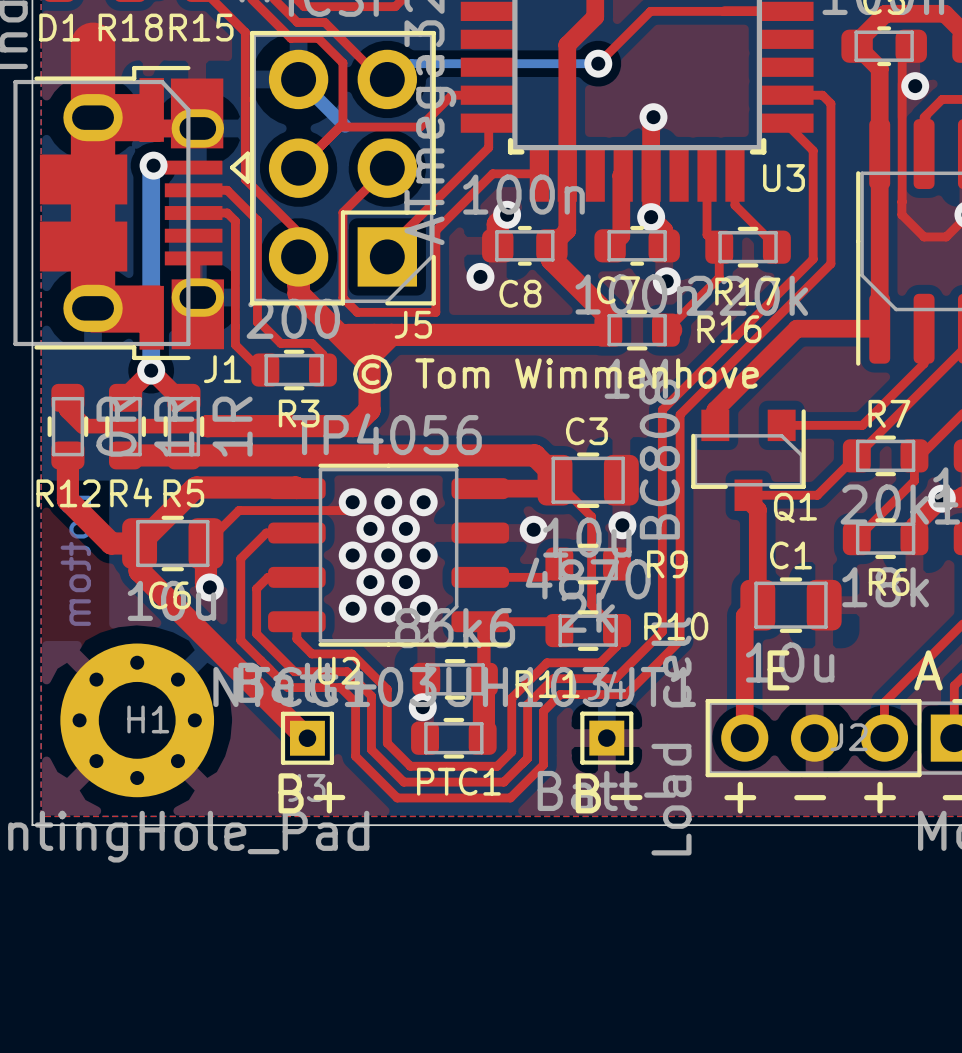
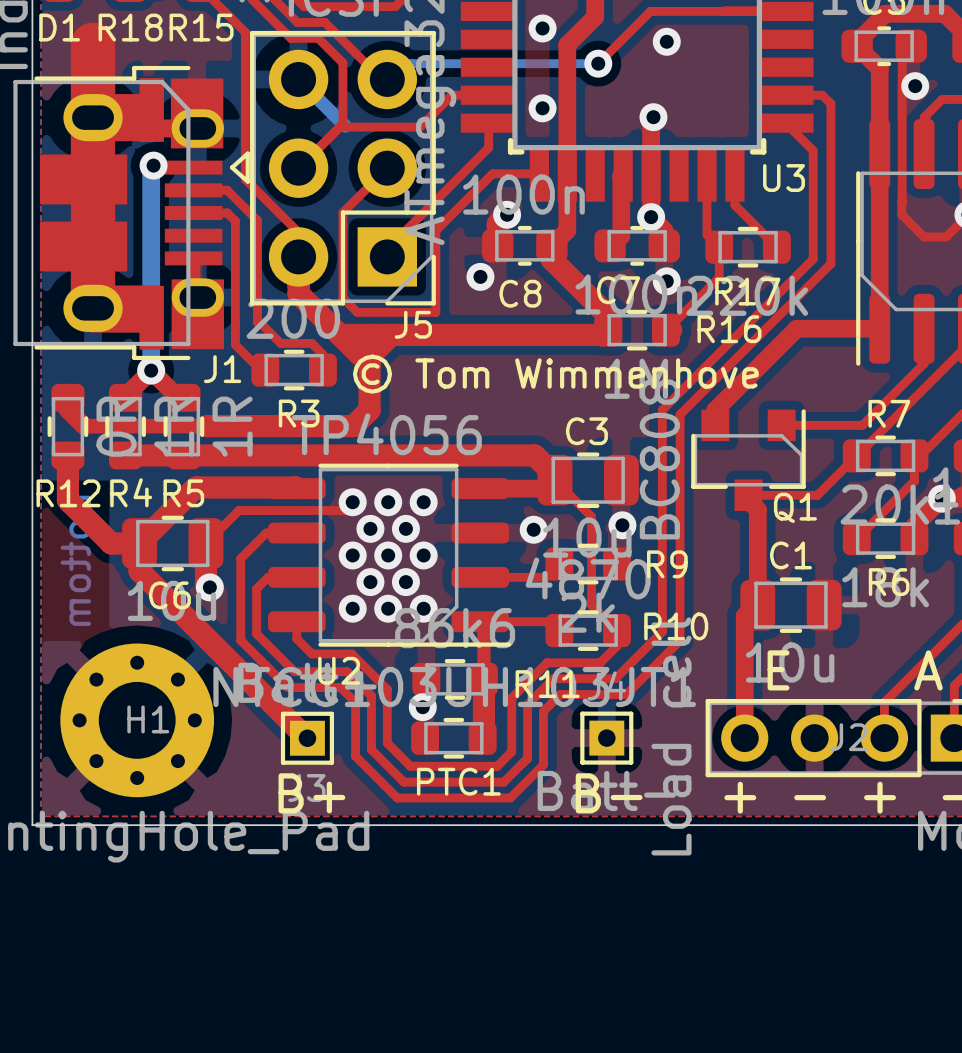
via: none -> (542, 28)
via: none -> (666, 41)
via: none -> (542, 108)

